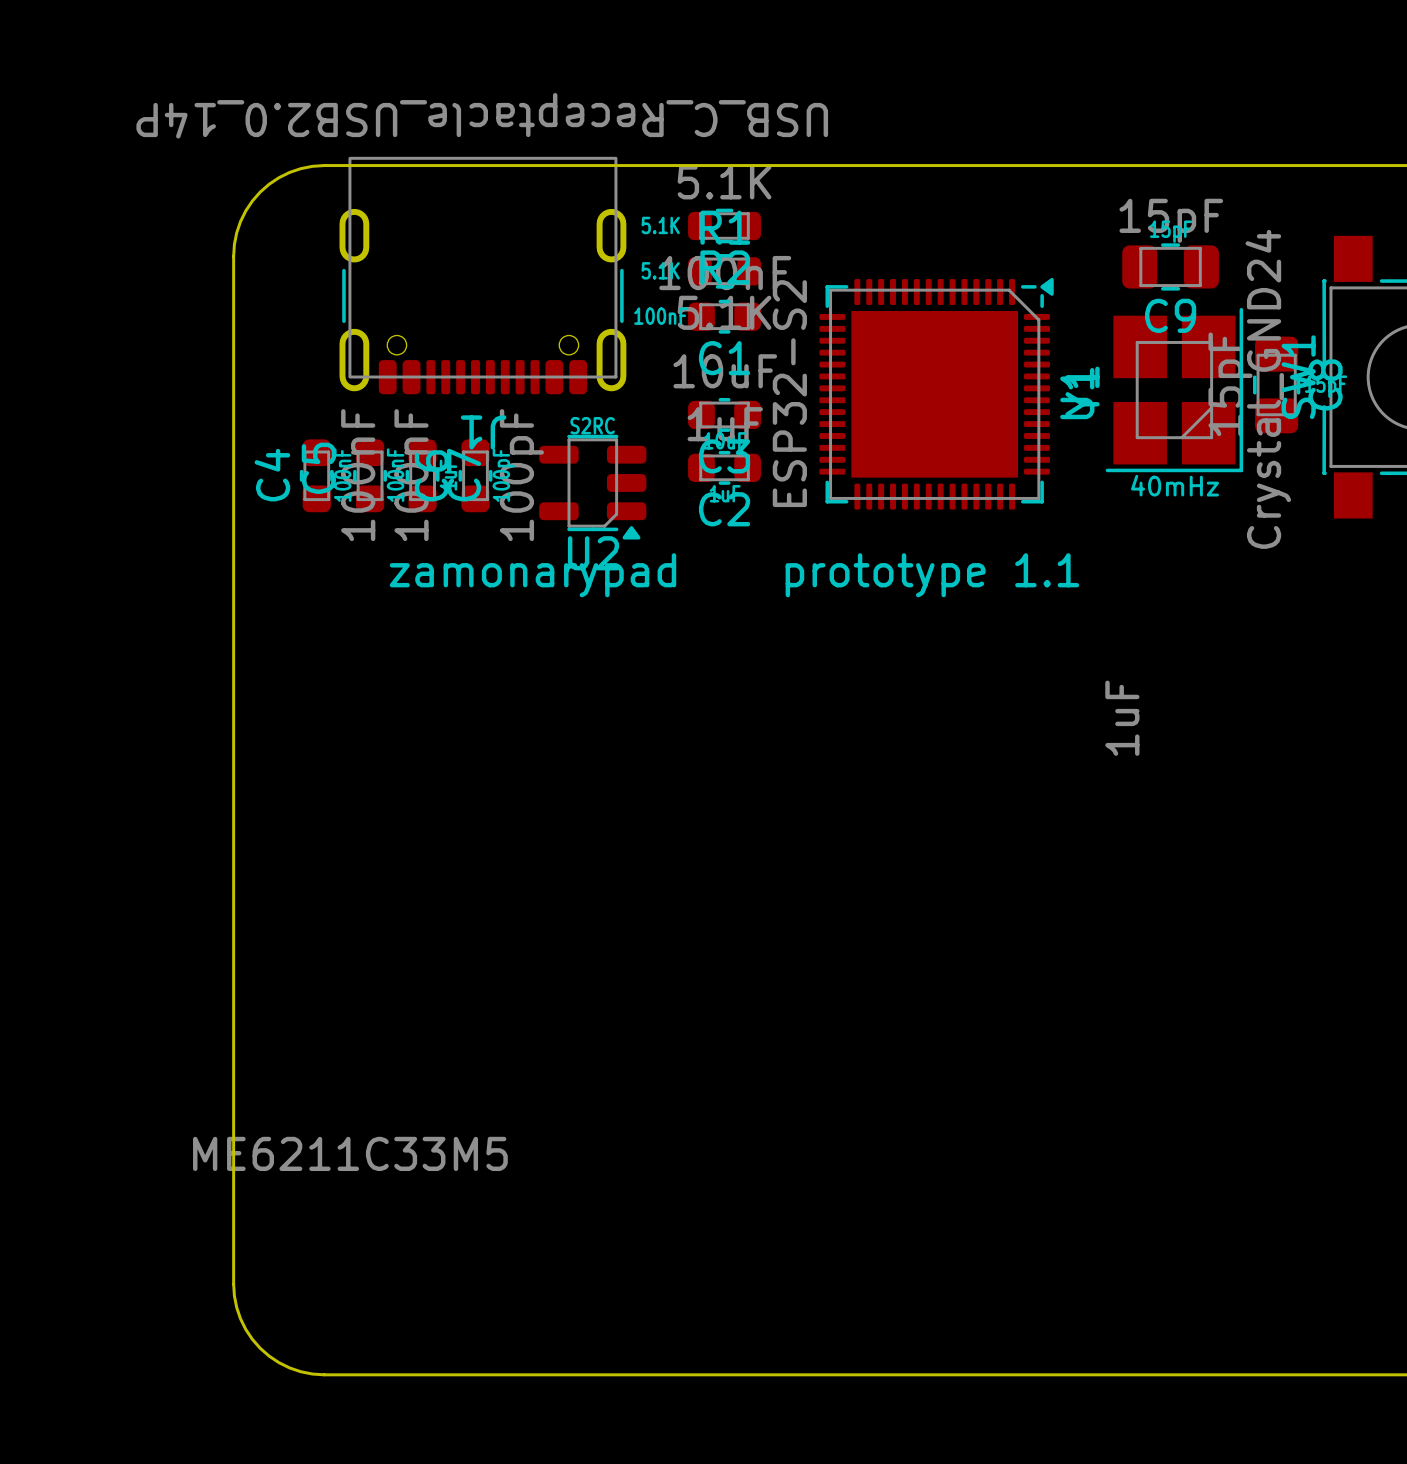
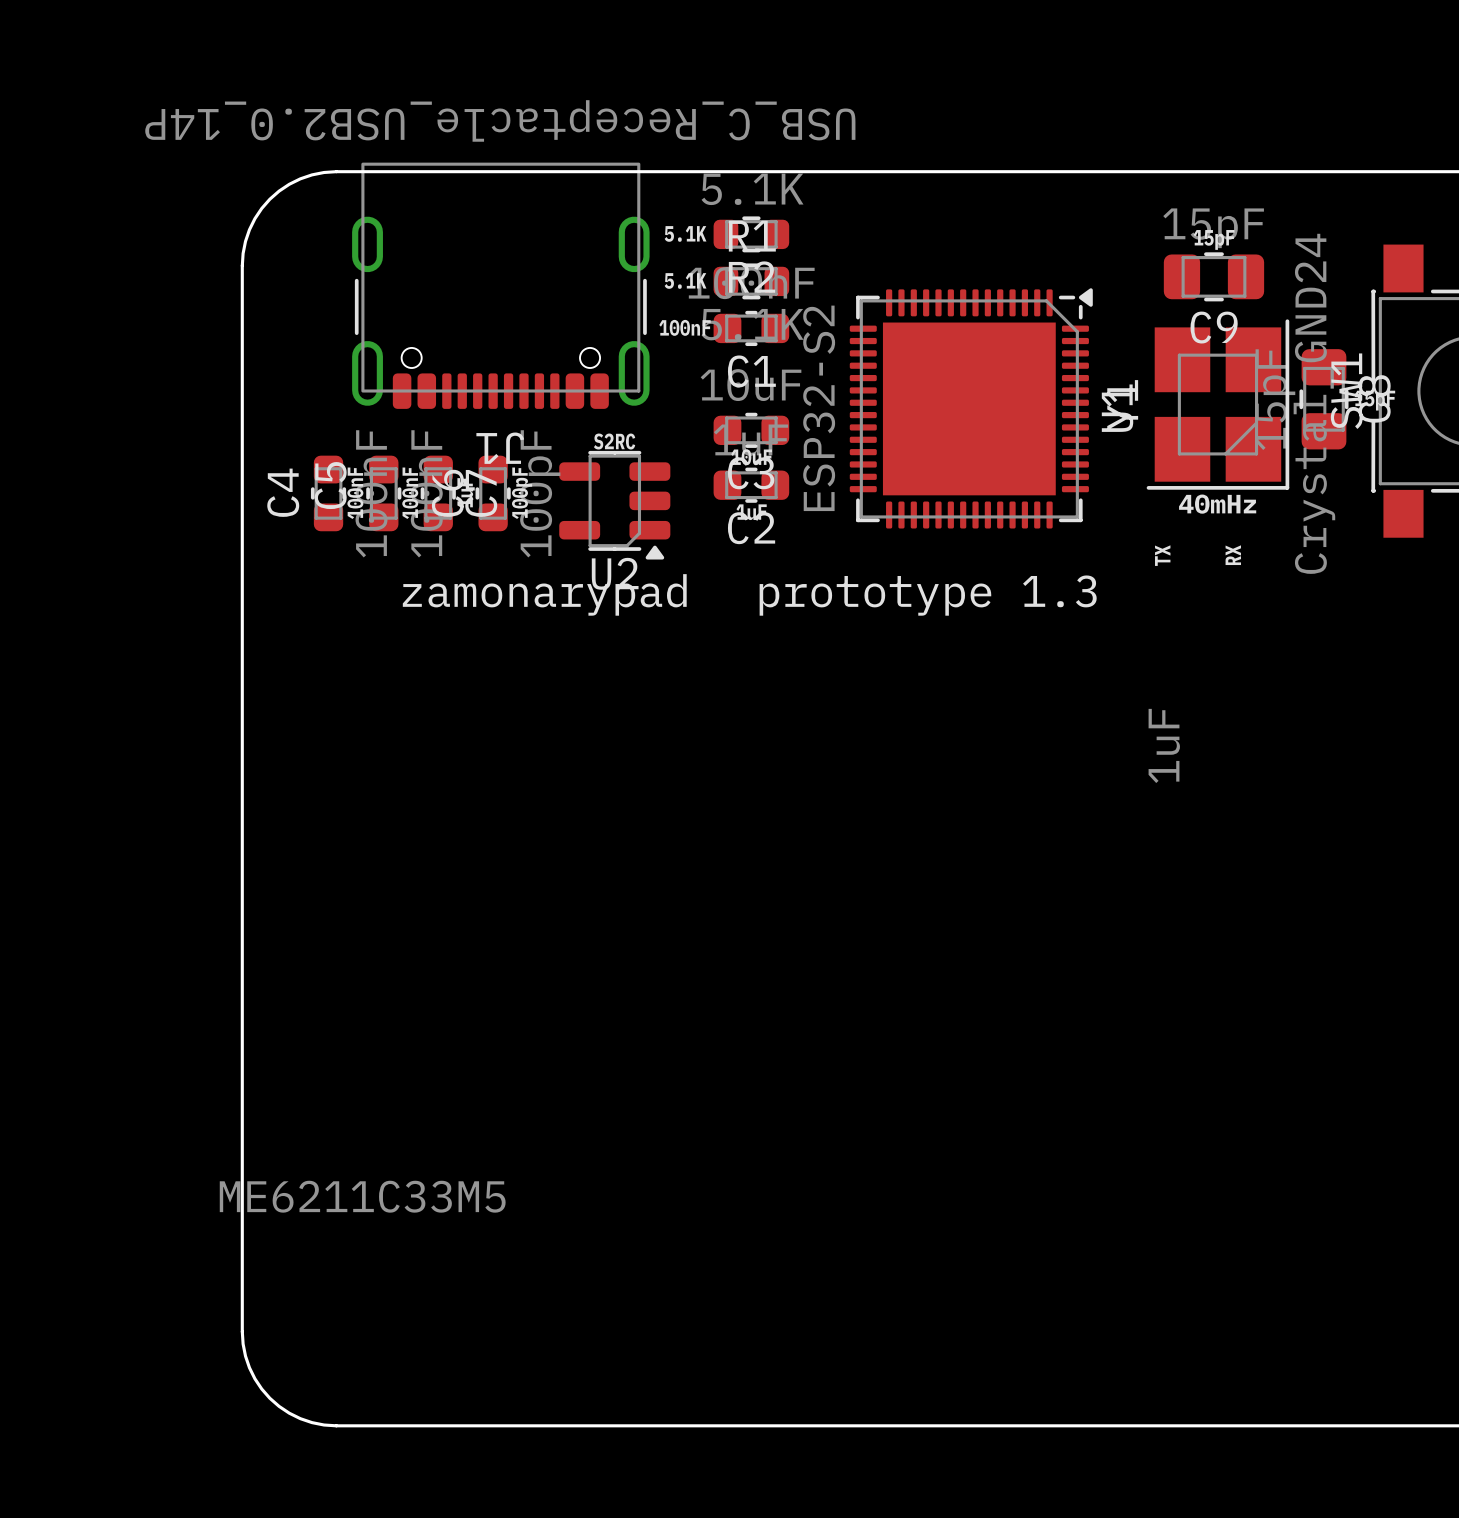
text: none -> RX (1233, 555)
text: none -> TX (1162, 555)
text: prototype 1.1 (932, 575) -> prototype 1.3 (928, 595)

